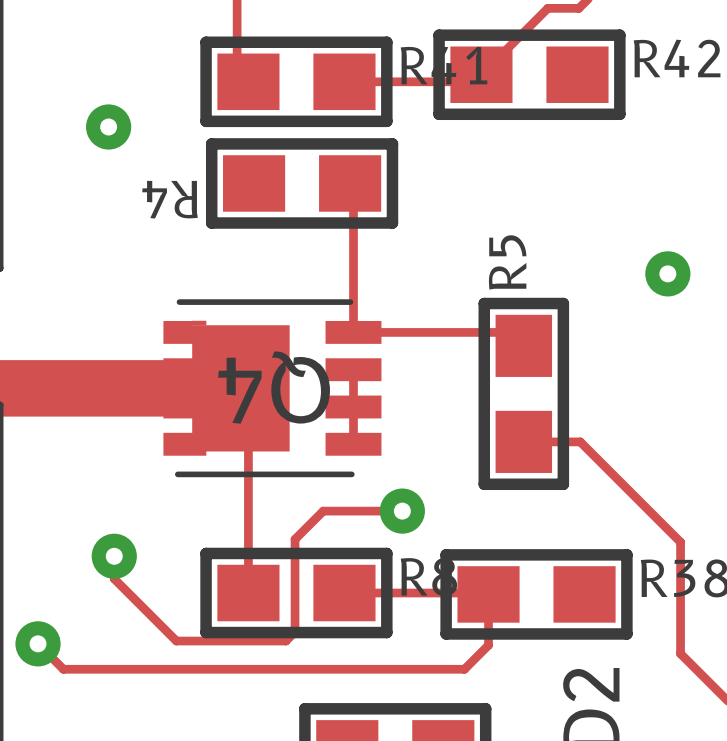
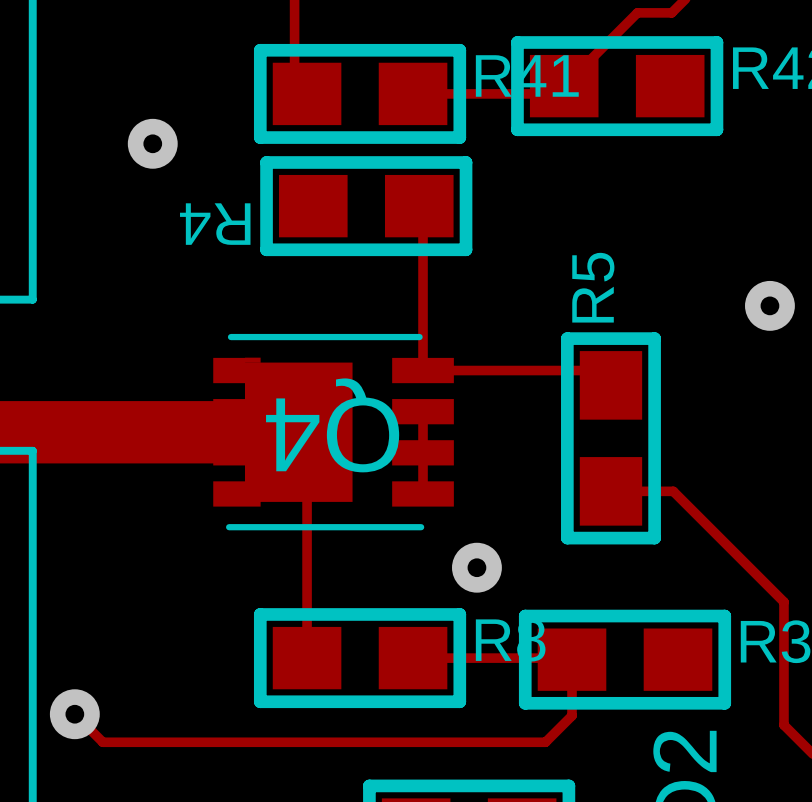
track: (402, 511) (323, 511) (295, 539) (295, 631) (285, 641) (176, 641) (114, 578) (114, 556) -> none
via: (114, 556) -> none

